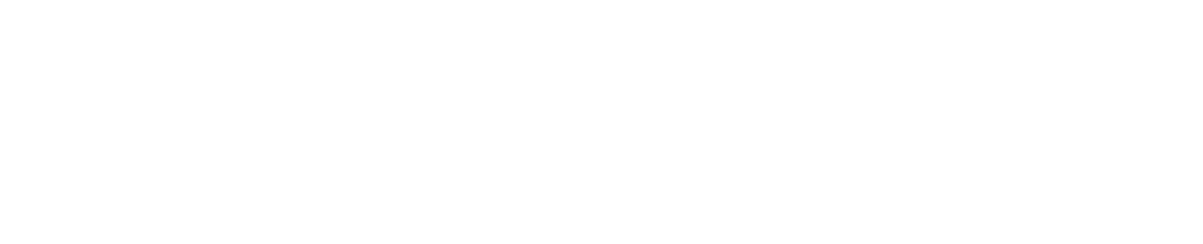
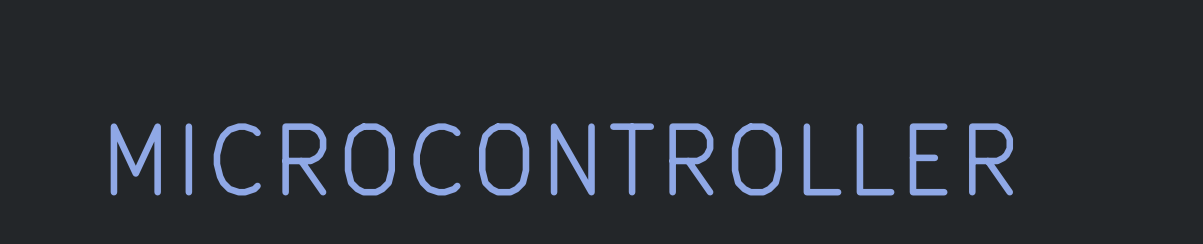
text: none -> MICROCONTROLLER (561, 159)

